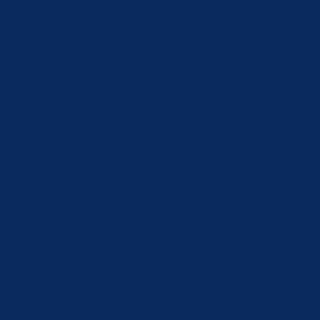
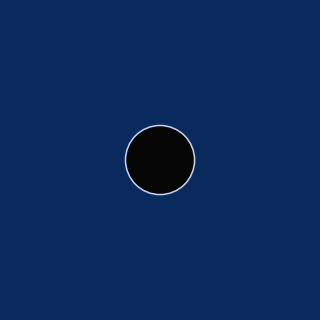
part: none -> (160, 160)

